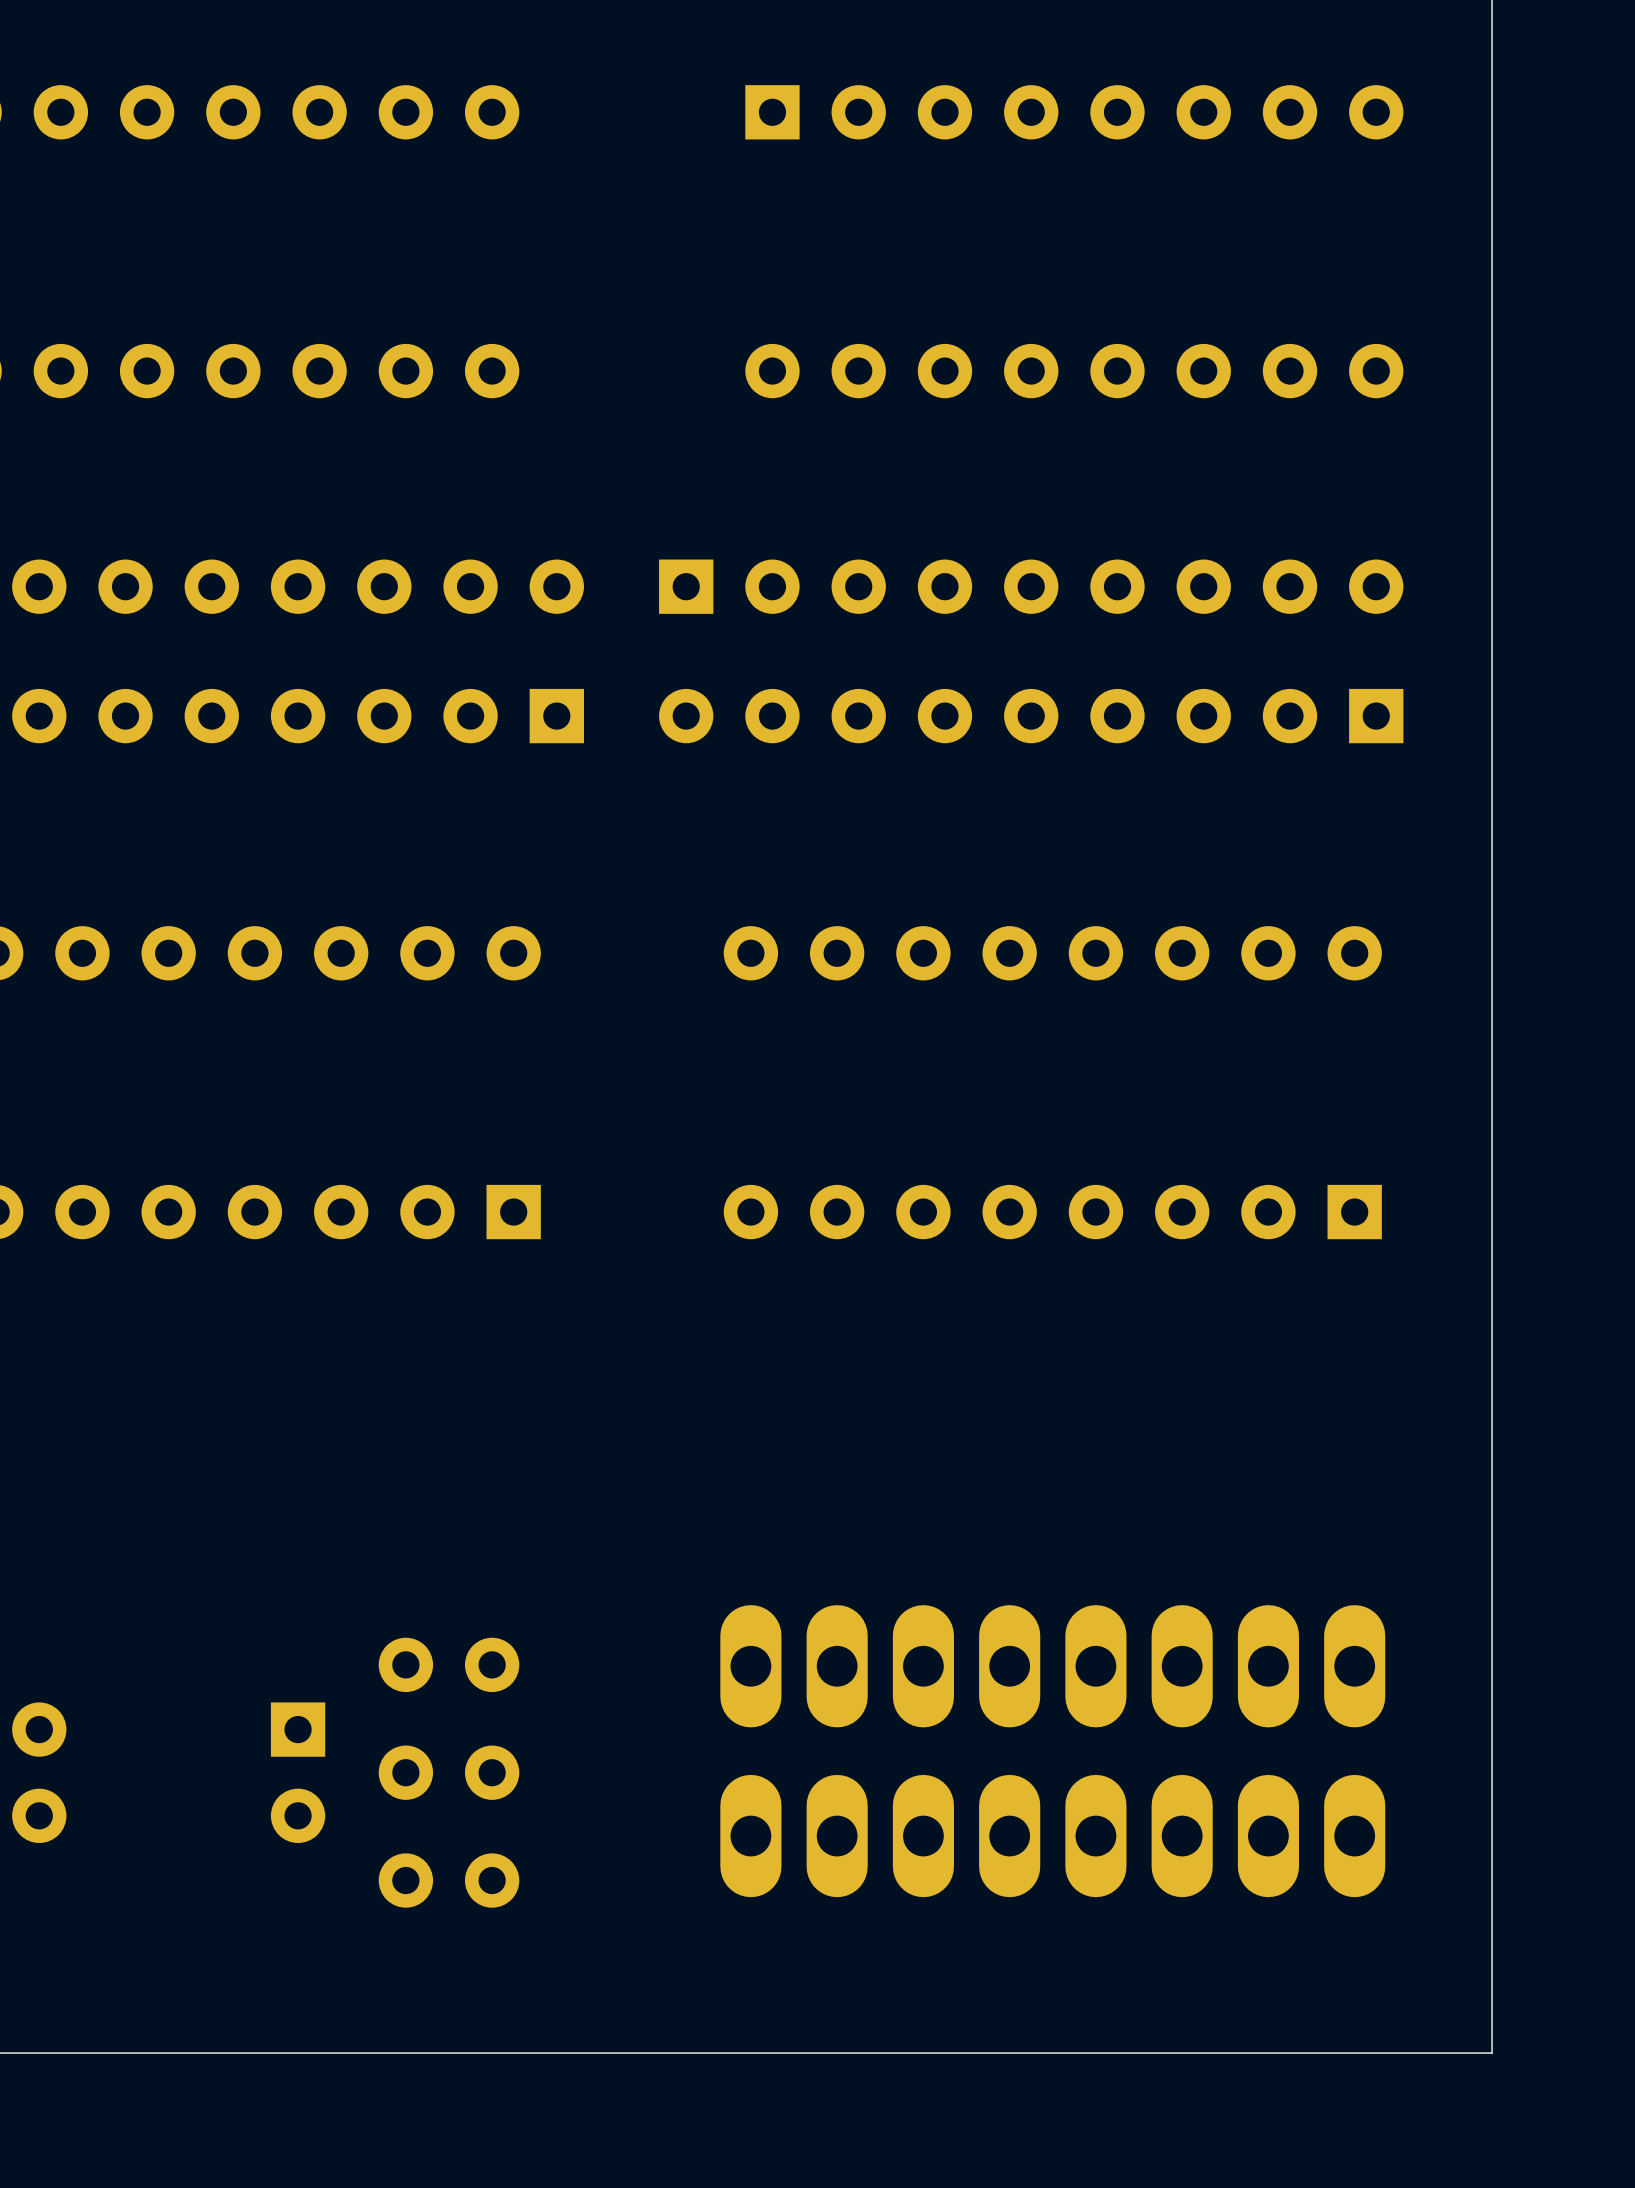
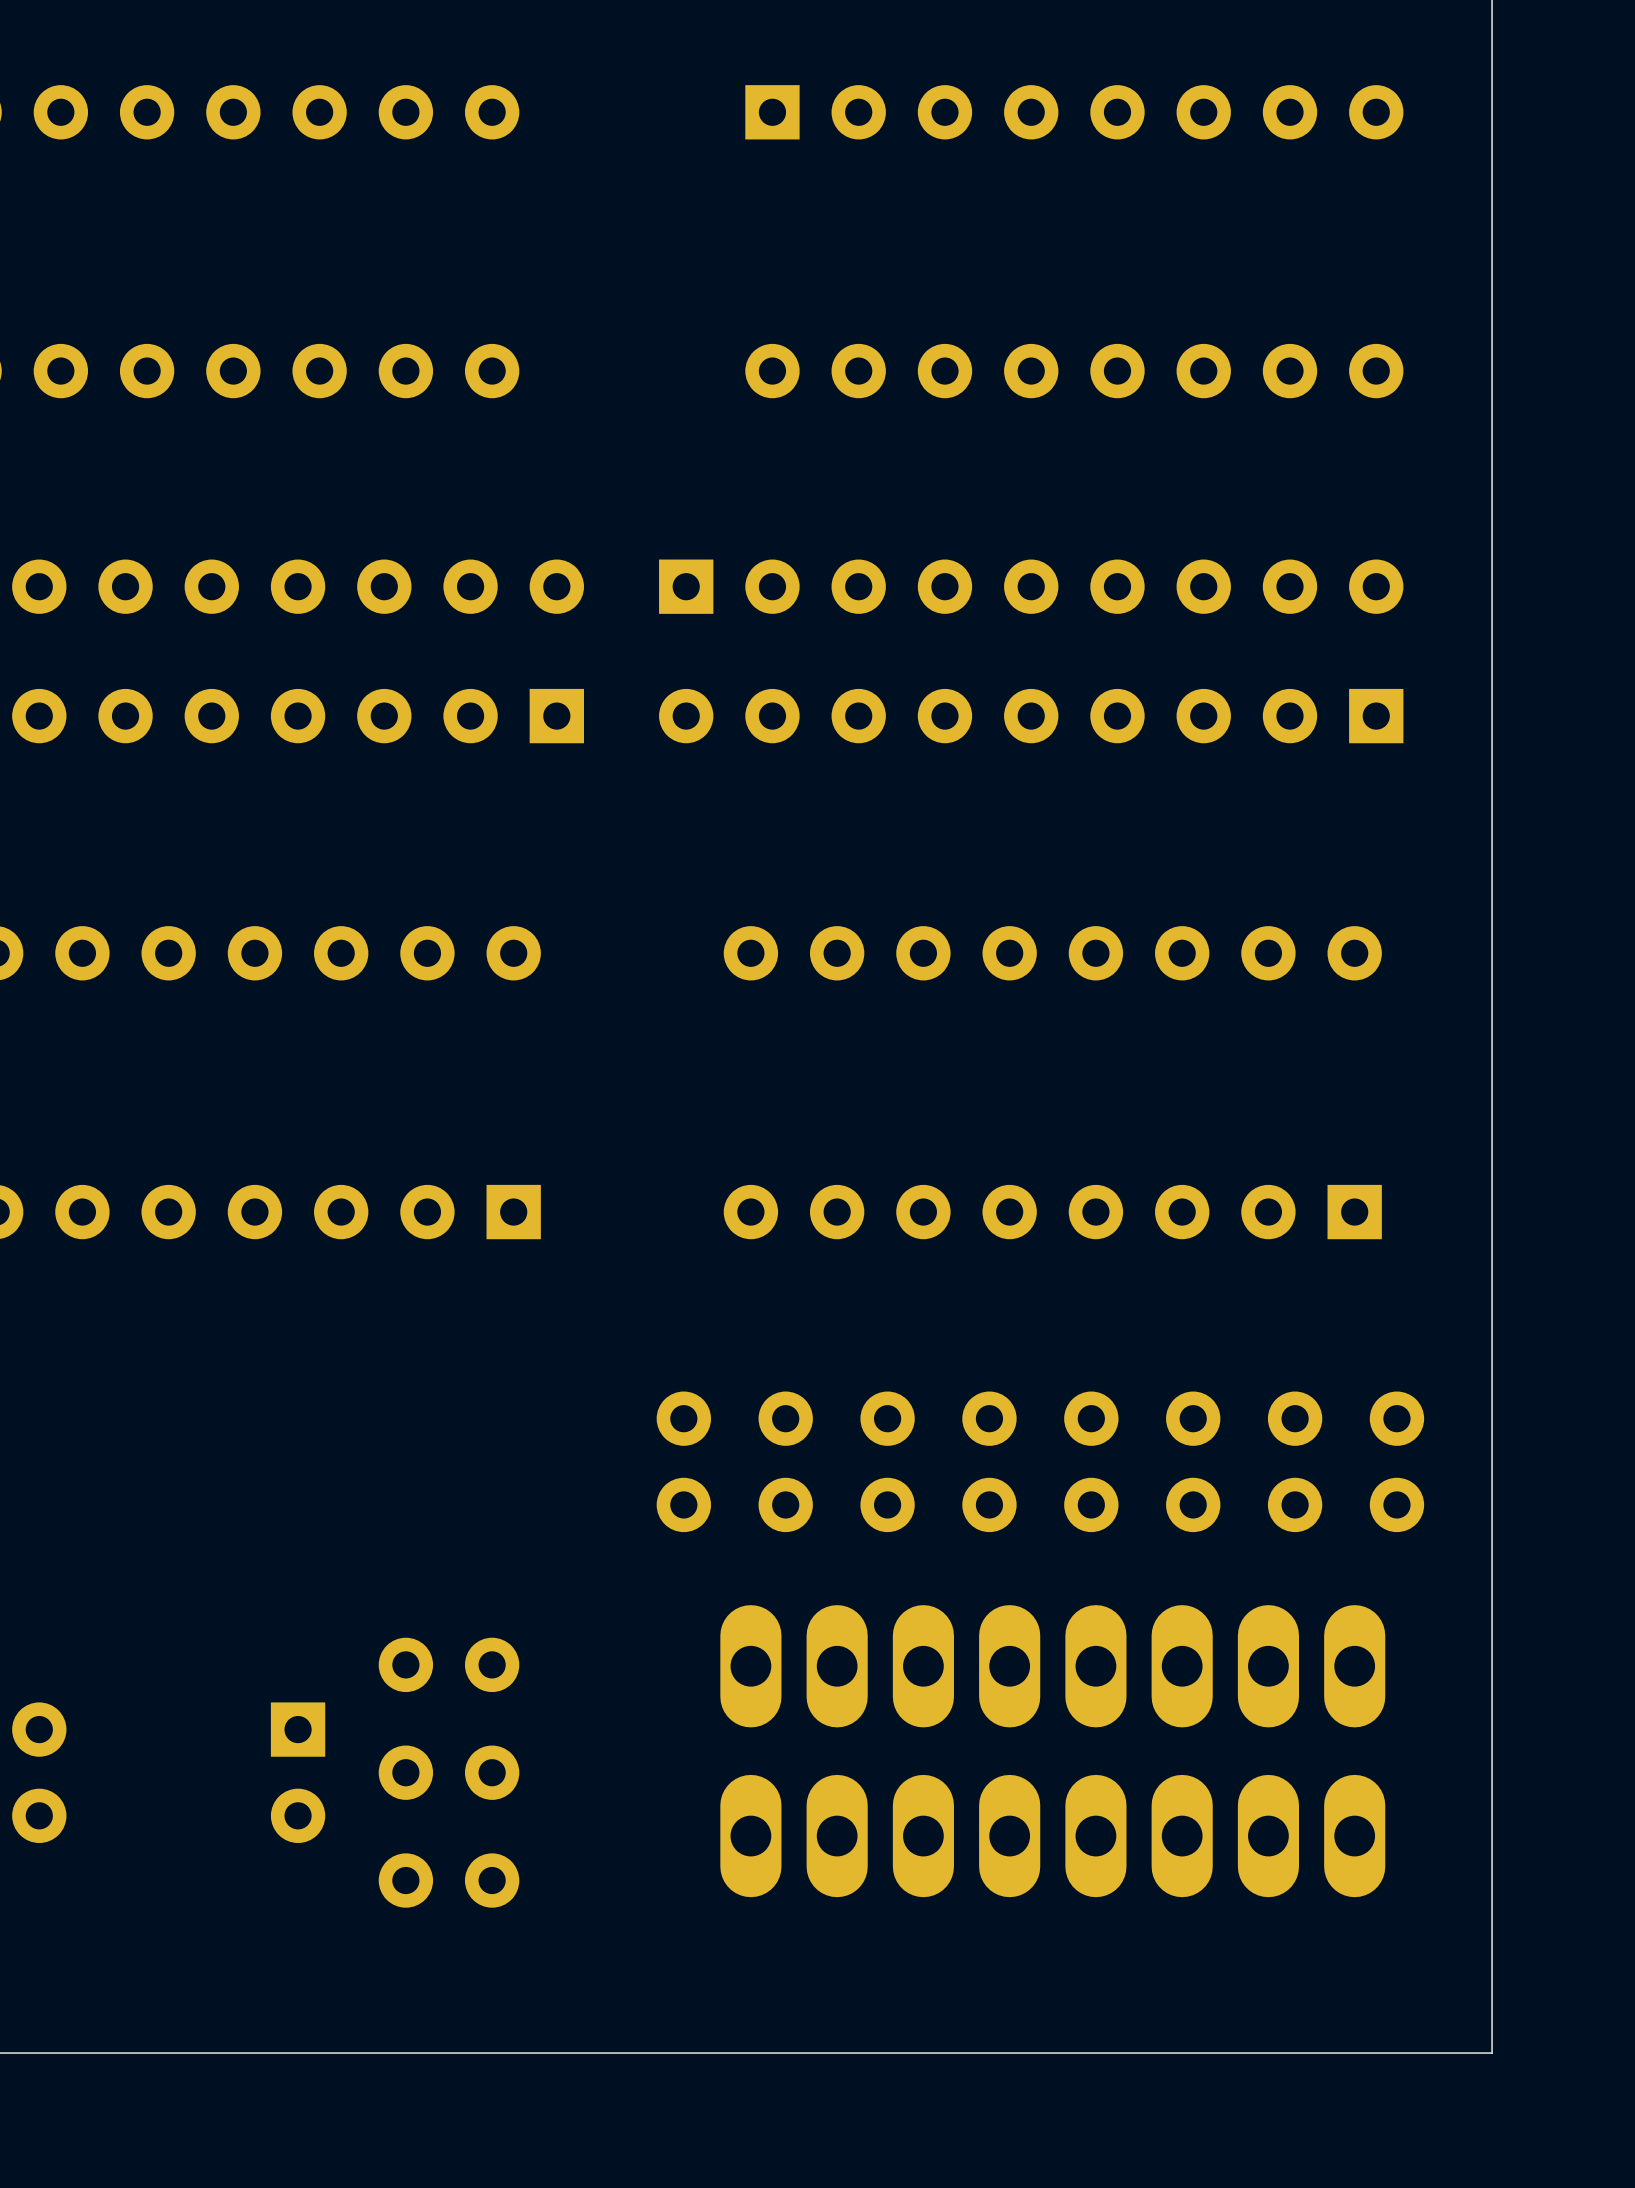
part: none -> (683, 1461)
part: none -> (785, 1461)
part: none -> (887, 1461)
part: none -> (989, 1461)
part: none -> (1091, 1461)
part: none -> (1193, 1461)
part: none -> (1295, 1461)
part: none -> (1396, 1461)

